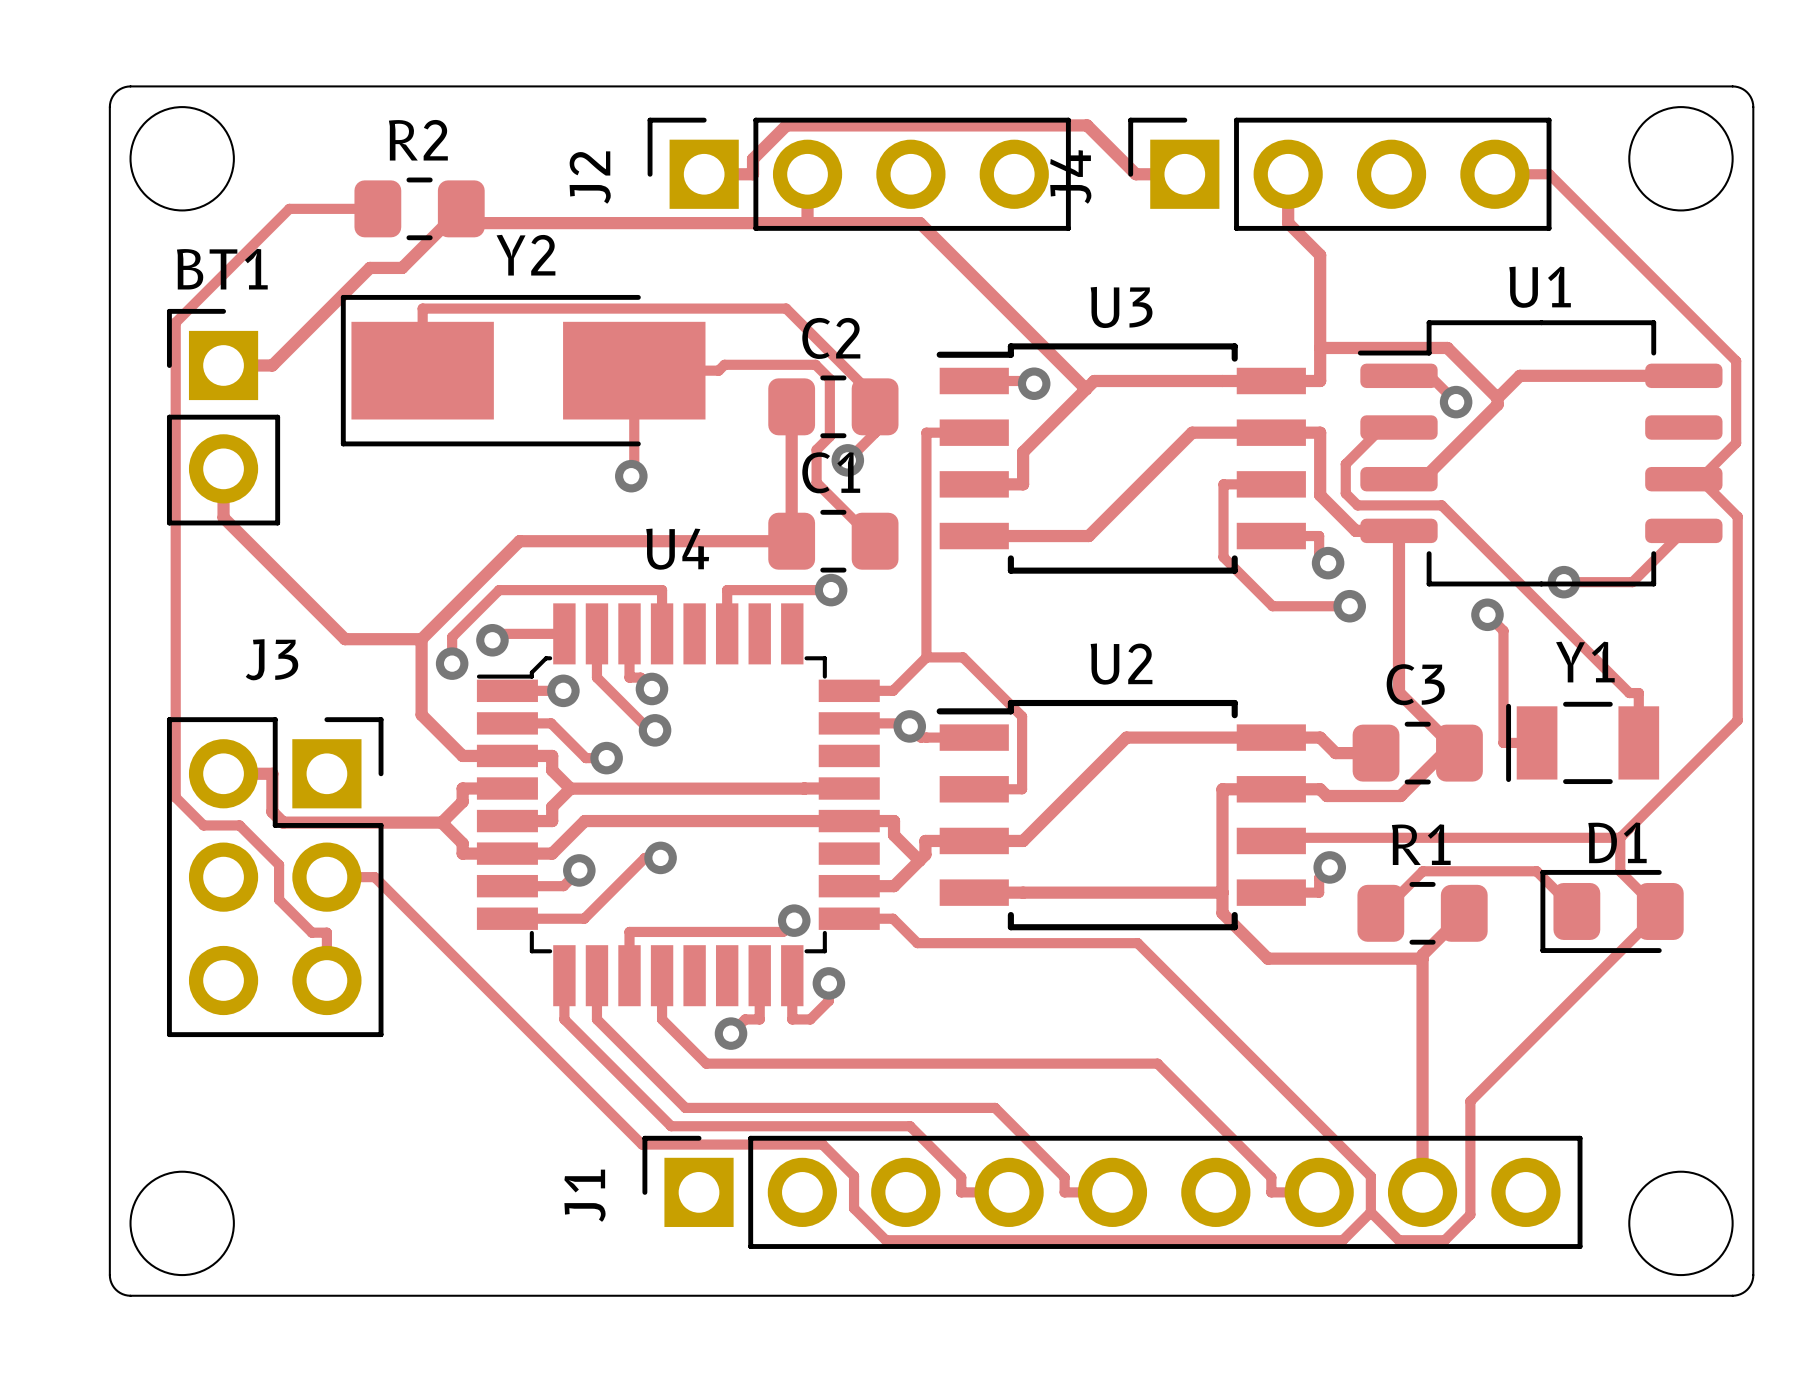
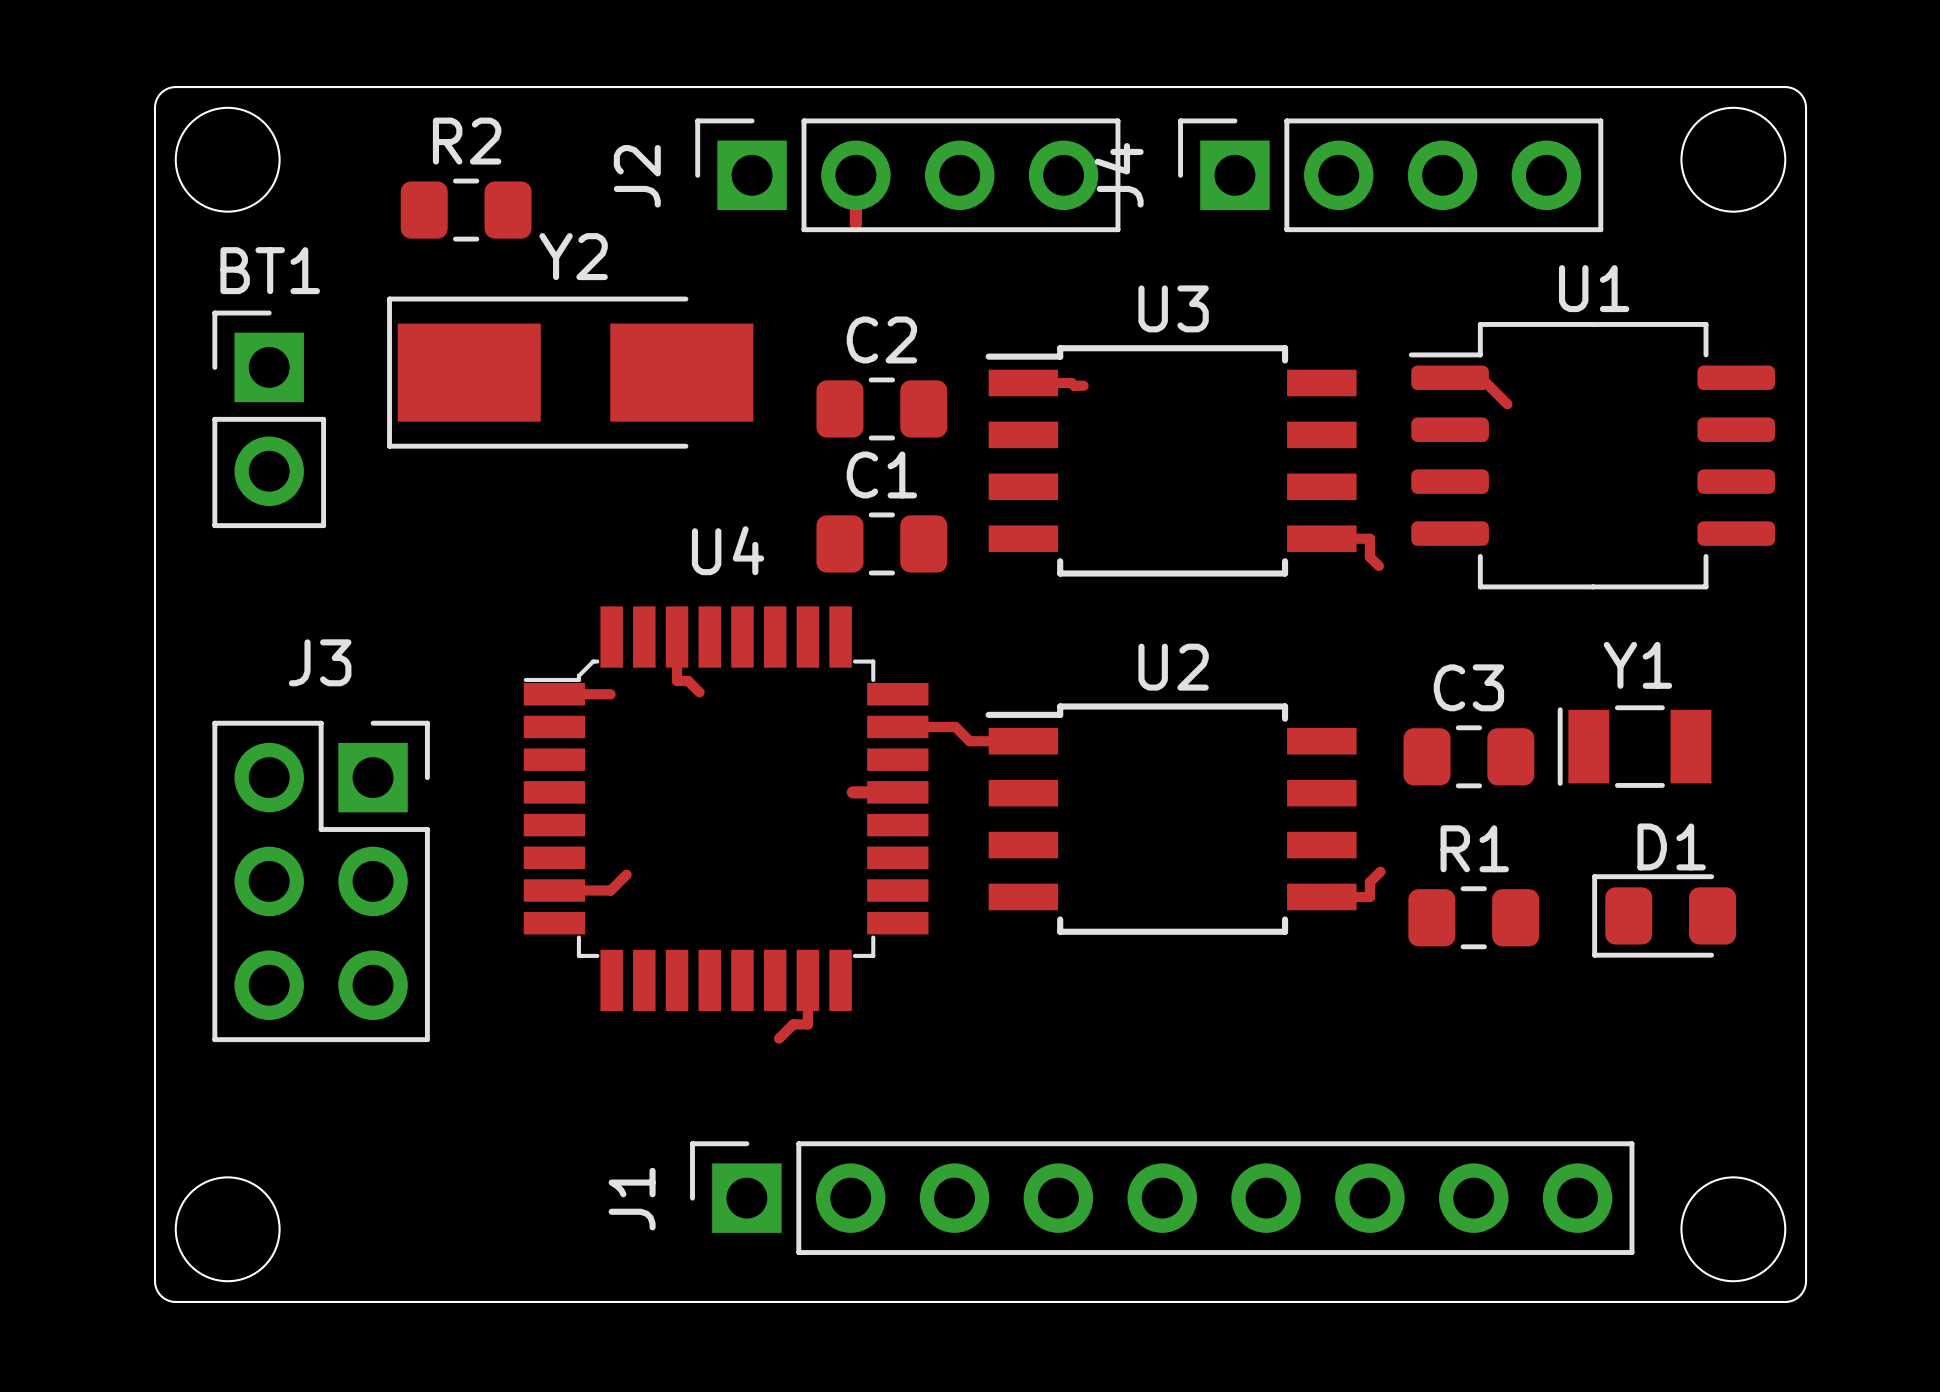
track: (704, 174) (753, 174) (753, 159) (786, 125) (1087, 125) (1135, 174) (1184, 174) -> none
track: (1288, 174) (1288, 223) (1320, 255) (1320, 380) (1094, 380) (1023, 452) (1023, 484) (974, 484) -> none
track: (1494, 174) (1549, 174) (1736, 361) (1736, 443) (1700, 479) -> none
track: (377, 208) (289, 208) (175, 322) (175, 797) (203, 825) (239, 825) (279, 864) (279, 899) (311, 932) (326, 932) (326, 980) -> none
track: (1320, 347) (1447, 347) (1497, 398) -> none
track: (223, 365) (272, 365) (369, 267) (402, 267) (461, 208) (475, 223) (920, 223) (1086, 389) -> none
track: (422, 370) (422, 308) (786, 308) (875, 397) (875, 433) (847, 460) -> none
track: (1683, 375) (1519, 375) (1497, 398) -> none
via: (1034, 383) -> none
track: (1497, 398) (1497, 404) (1423, 479) (1398, 479) -> none
via: (1456, 402) -> none
track: (791, 406) (791, 541) (519, 541) (421, 639) -> none
track: (1398, 427) (1382, 427) (1345, 464) (1345, 493) (1357, 505) (1441, 505) (1629, 693) (1638, 693) (1638, 742) -> none
track: (974, 432) (926, 432) (926, 657) -> none
via: (847, 460) -> none
track: (223, 468) (223, 517) (345, 639) (421, 639) -> none
track: (631, 476) (634, 473) (634, 370) (718, 370) (724, 364) (815, 364) (829, 379) (829, 436) (816, 449) (816, 482) (875, 541) -> none
via: (631, 476) -> none
track: (1700, 479) (1737, 516) (1737, 720) (1620, 837) -> none
track: (1271, 484) (1223, 484) (1223, 557) (1272, 606) (1349, 606) -> none
track: (1683, 530) (1632, 582) (1563, 582) -> none
track: (974, 536) (1088, 536) (1192, 432) (1320, 432) (1320, 495) (1355, 530) (1398, 530) (1398, 692) (1459, 753) -> none
via: (1328, 563) -> none
via: (1563, 582) -> none
track: (831, 590) (727, 590) (727, 633) -> none
via: (831, 590) -> none
via: (1349, 606) -> none
track: (1487, 614) (1503, 630) (1503, 742) (1537, 742) -> none
via: (1487, 614) -> none
track: (564, 633) (498, 633) (492, 640) -> none
track: (596, 633) (596, 677) (649, 730) (655, 730) -> none
track: (662, 633) (662, 590) (499, 590) (452, 637) (452, 663) -> none
track: (421, 639) (421, 714) (462, 755) (552, 755) (552, 770) (570, 788) -> none
via: (492, 640) -> none
track: (926, 657) (893, 690) (849, 690) -> none
track: (926, 657) (963, 657) (1022, 716) (1022, 789) (974, 789) -> none
via: (452, 663) -> none
via: (651, 688) -> none
via: (563, 690) -> none
track: (507, 723) (551, 723) (585, 758) (606, 758) -> none
via: (909, 726) -> none
via: (655, 730) -> none
track: (1451, 745) (1400, 796) (1326, 796) (1320, 789) (1222, 789) (1222, 913) (1267, 958) (1422, 958) -> none
track: (1376, 753) (1335, 753) (1320, 737) (1126, 737) (1023, 840) (925, 840) (925, 854) (894, 886) (849, 886) -> none
via: (606, 758) -> none
track: (223, 773) (272, 773) (272, 811) (283, 822) (441, 822) -> none
track: (507, 788) (462, 788) (462, 801) (441, 822) -> none
track: (570, 788) (804, 788) -> none
track: (570, 788) (552, 806) (552, 821) (507, 821) -> none
track: (441, 822) (462, 843) (462, 853) (552, 853) (584, 821) (894, 821) (894, 835) (919, 860) -> none
track: (1620, 837) (1274, 837) (1271, 840) -> none
track: (1620, 837) (1620, 871) (1660, 911) (1470, 1101) (1470, 1214) (1444, 1240) (1398, 1240) (1370, 1212) -> none
track: (660, 857) (645, 857) (584, 918) (507, 918) -> none
via: (660, 857) -> none
via: (1329, 867) -> none
via: (579, 870) -> none
track: (326, 877) (374, 877) (642, 1144) (822, 1144) (854, 1176) (854, 1208) (885, 1240) (1342, 1240) (1370, 1212) -> none
track: (974, 892) (1222, 892) -> none
track: (1576, 911) (1536, 871) (1422, 871) (1380, 913) -> none
track: (1464, 913) (1422, 955) (1422, 1192) -> none
track: (849, 918) (893, 918) (917, 943) (1137, 943) (1370, 1176) (1370, 1212) -> none
track: (794, 920) (782, 931) (629, 931) (629, 975) -> none
via: (794, 920) -> none
track: (564, 975) (564, 1019) (671, 1126) (910, 1126) (961, 1177) (961, 1192) (1009, 1192) -> none
track: (596, 975) (596, 1019) (685, 1107) (995, 1107) (1064, 1177) (1064, 1192) (1112, 1192) -> none
track: (662, 975) (662, 1019) (706, 1063) (1157, 1063) (1271, 1177) (1271, 1192) (1319, 1192) -> none
track: (792, 975) (792, 1019) (810, 1019) (828, 1000) (828, 983) -> none
via: (828, 983) -> none
via: (731, 1033) -> none

